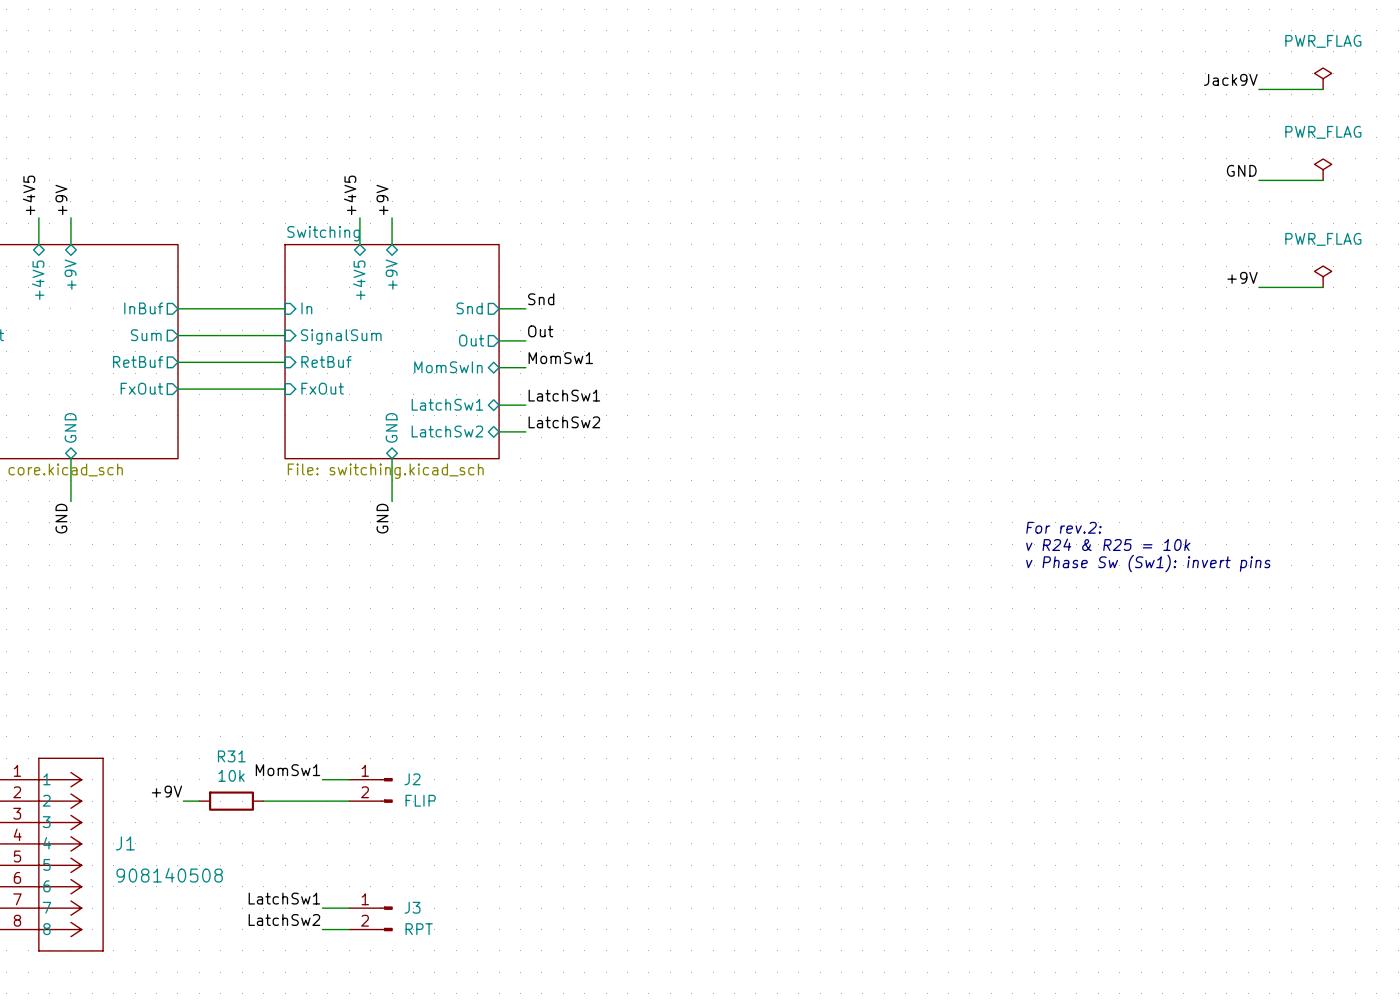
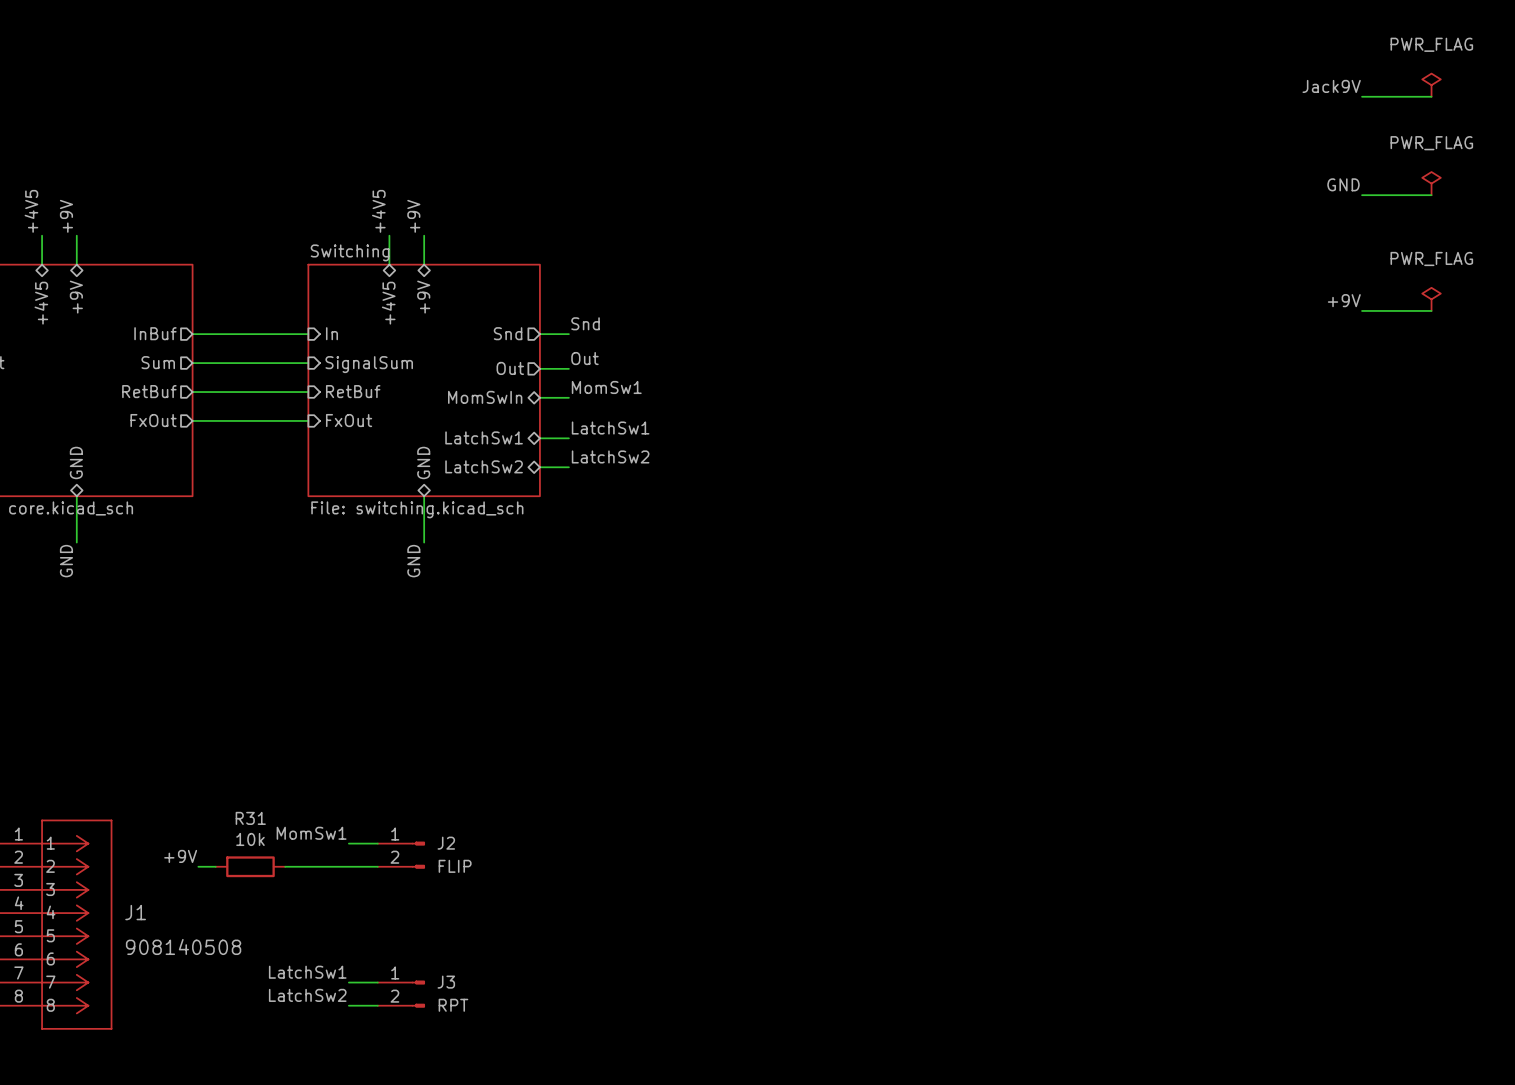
text: For rev.2: (1063, 527) -> none
text: v R24 & R25 = 10k (1108, 544) -> none
text: v Phase Sw (Sw1): invert pins (1148, 563) -> none

